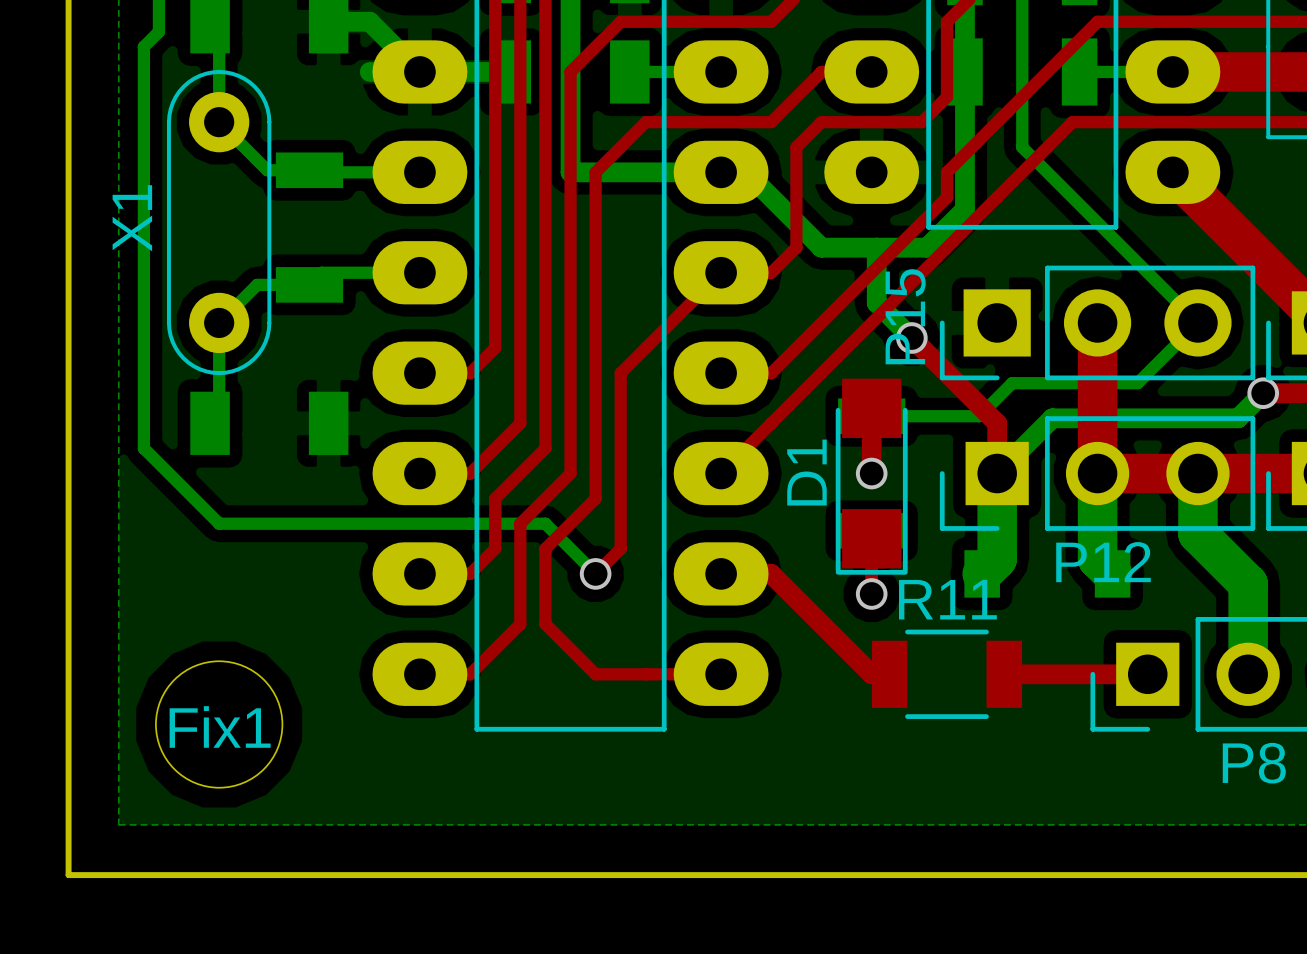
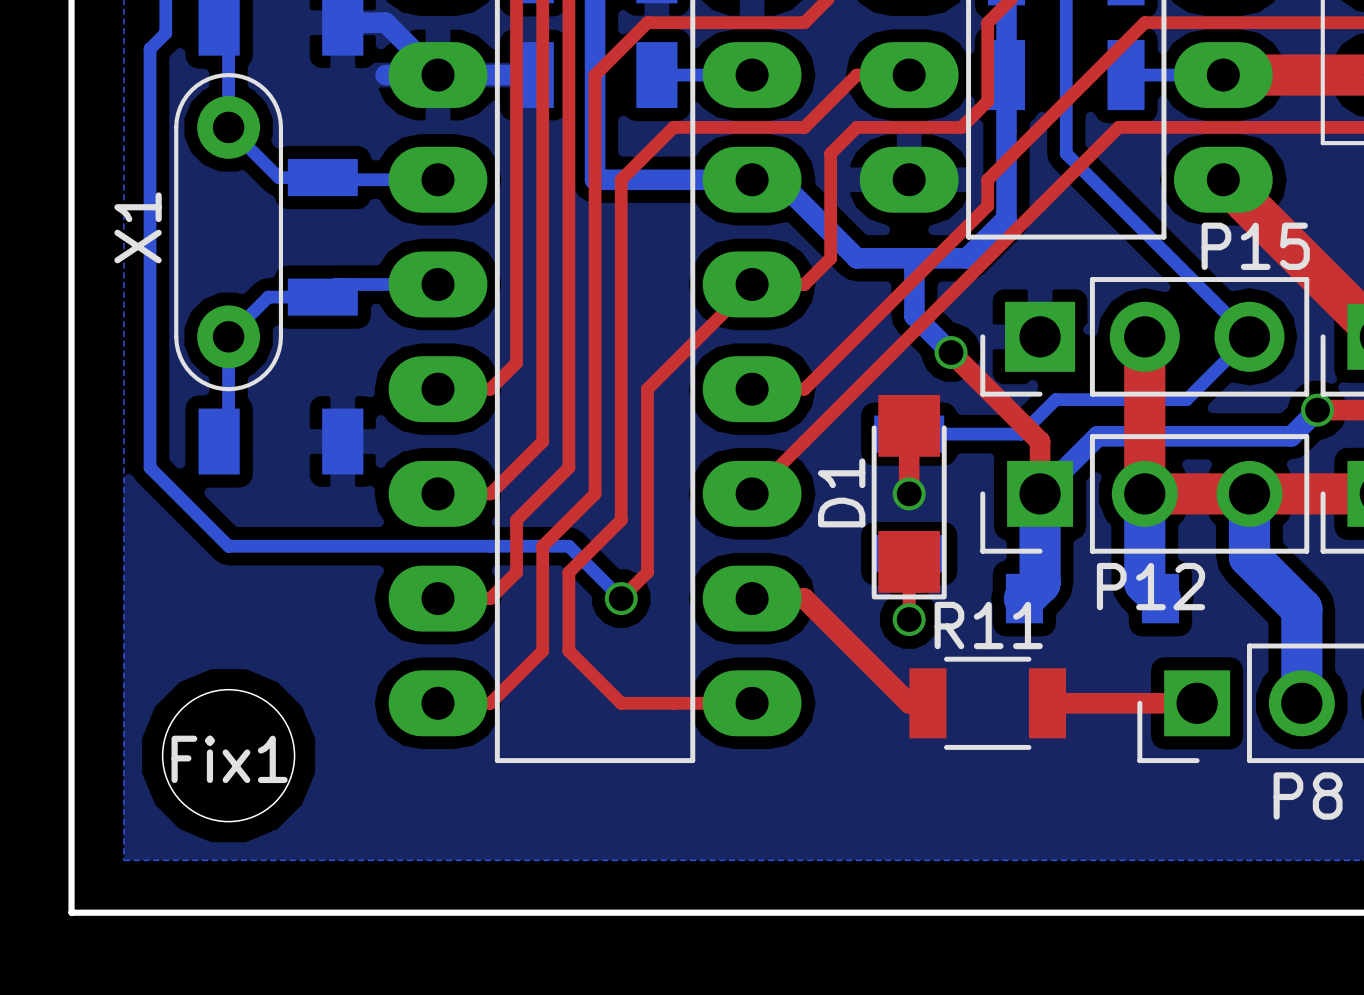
P15 name rotation: 0° (905, 316) -> 90° clockwise (1255, 246)
P15 name position: P15 (905, 316) -> P15 (1255, 246)

